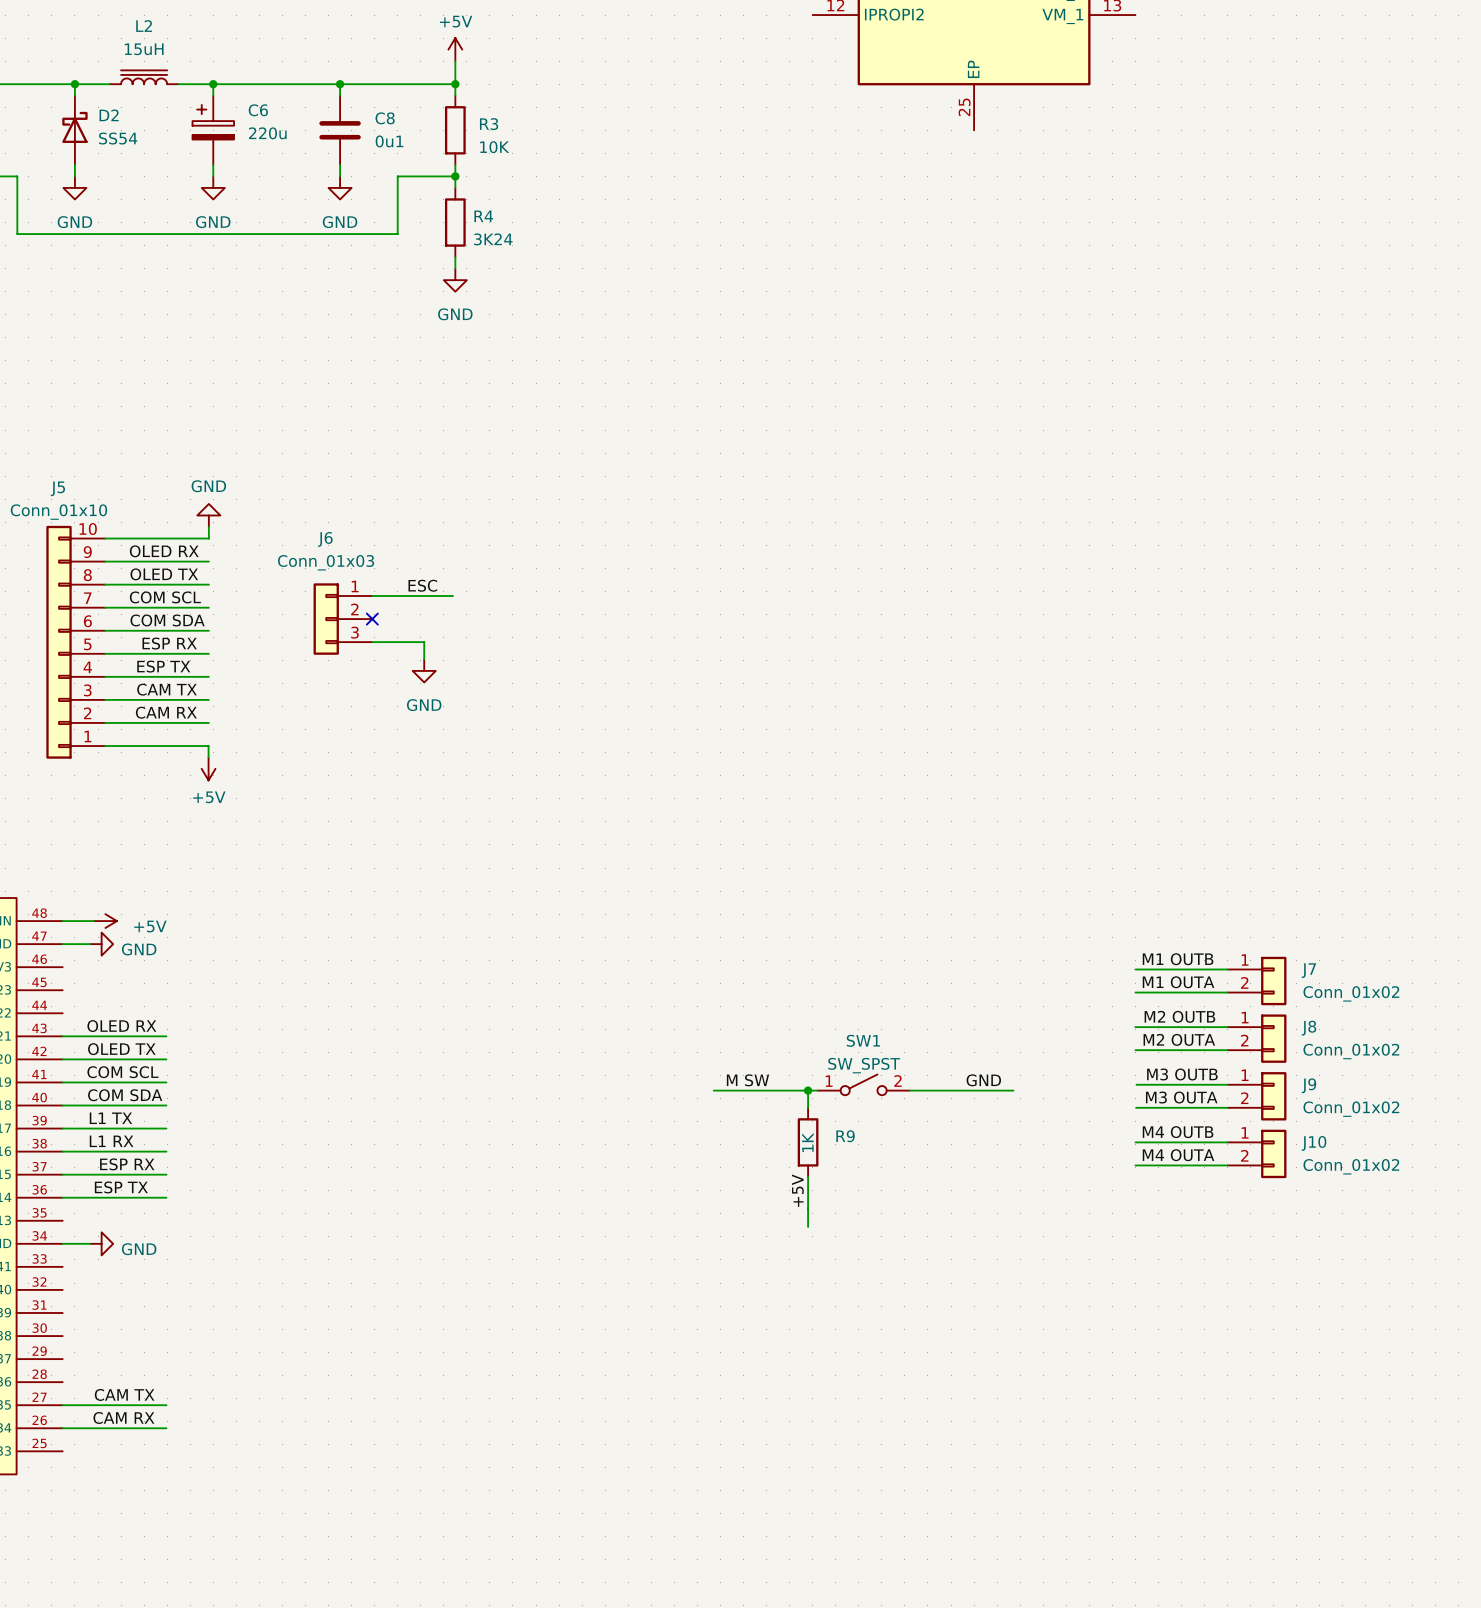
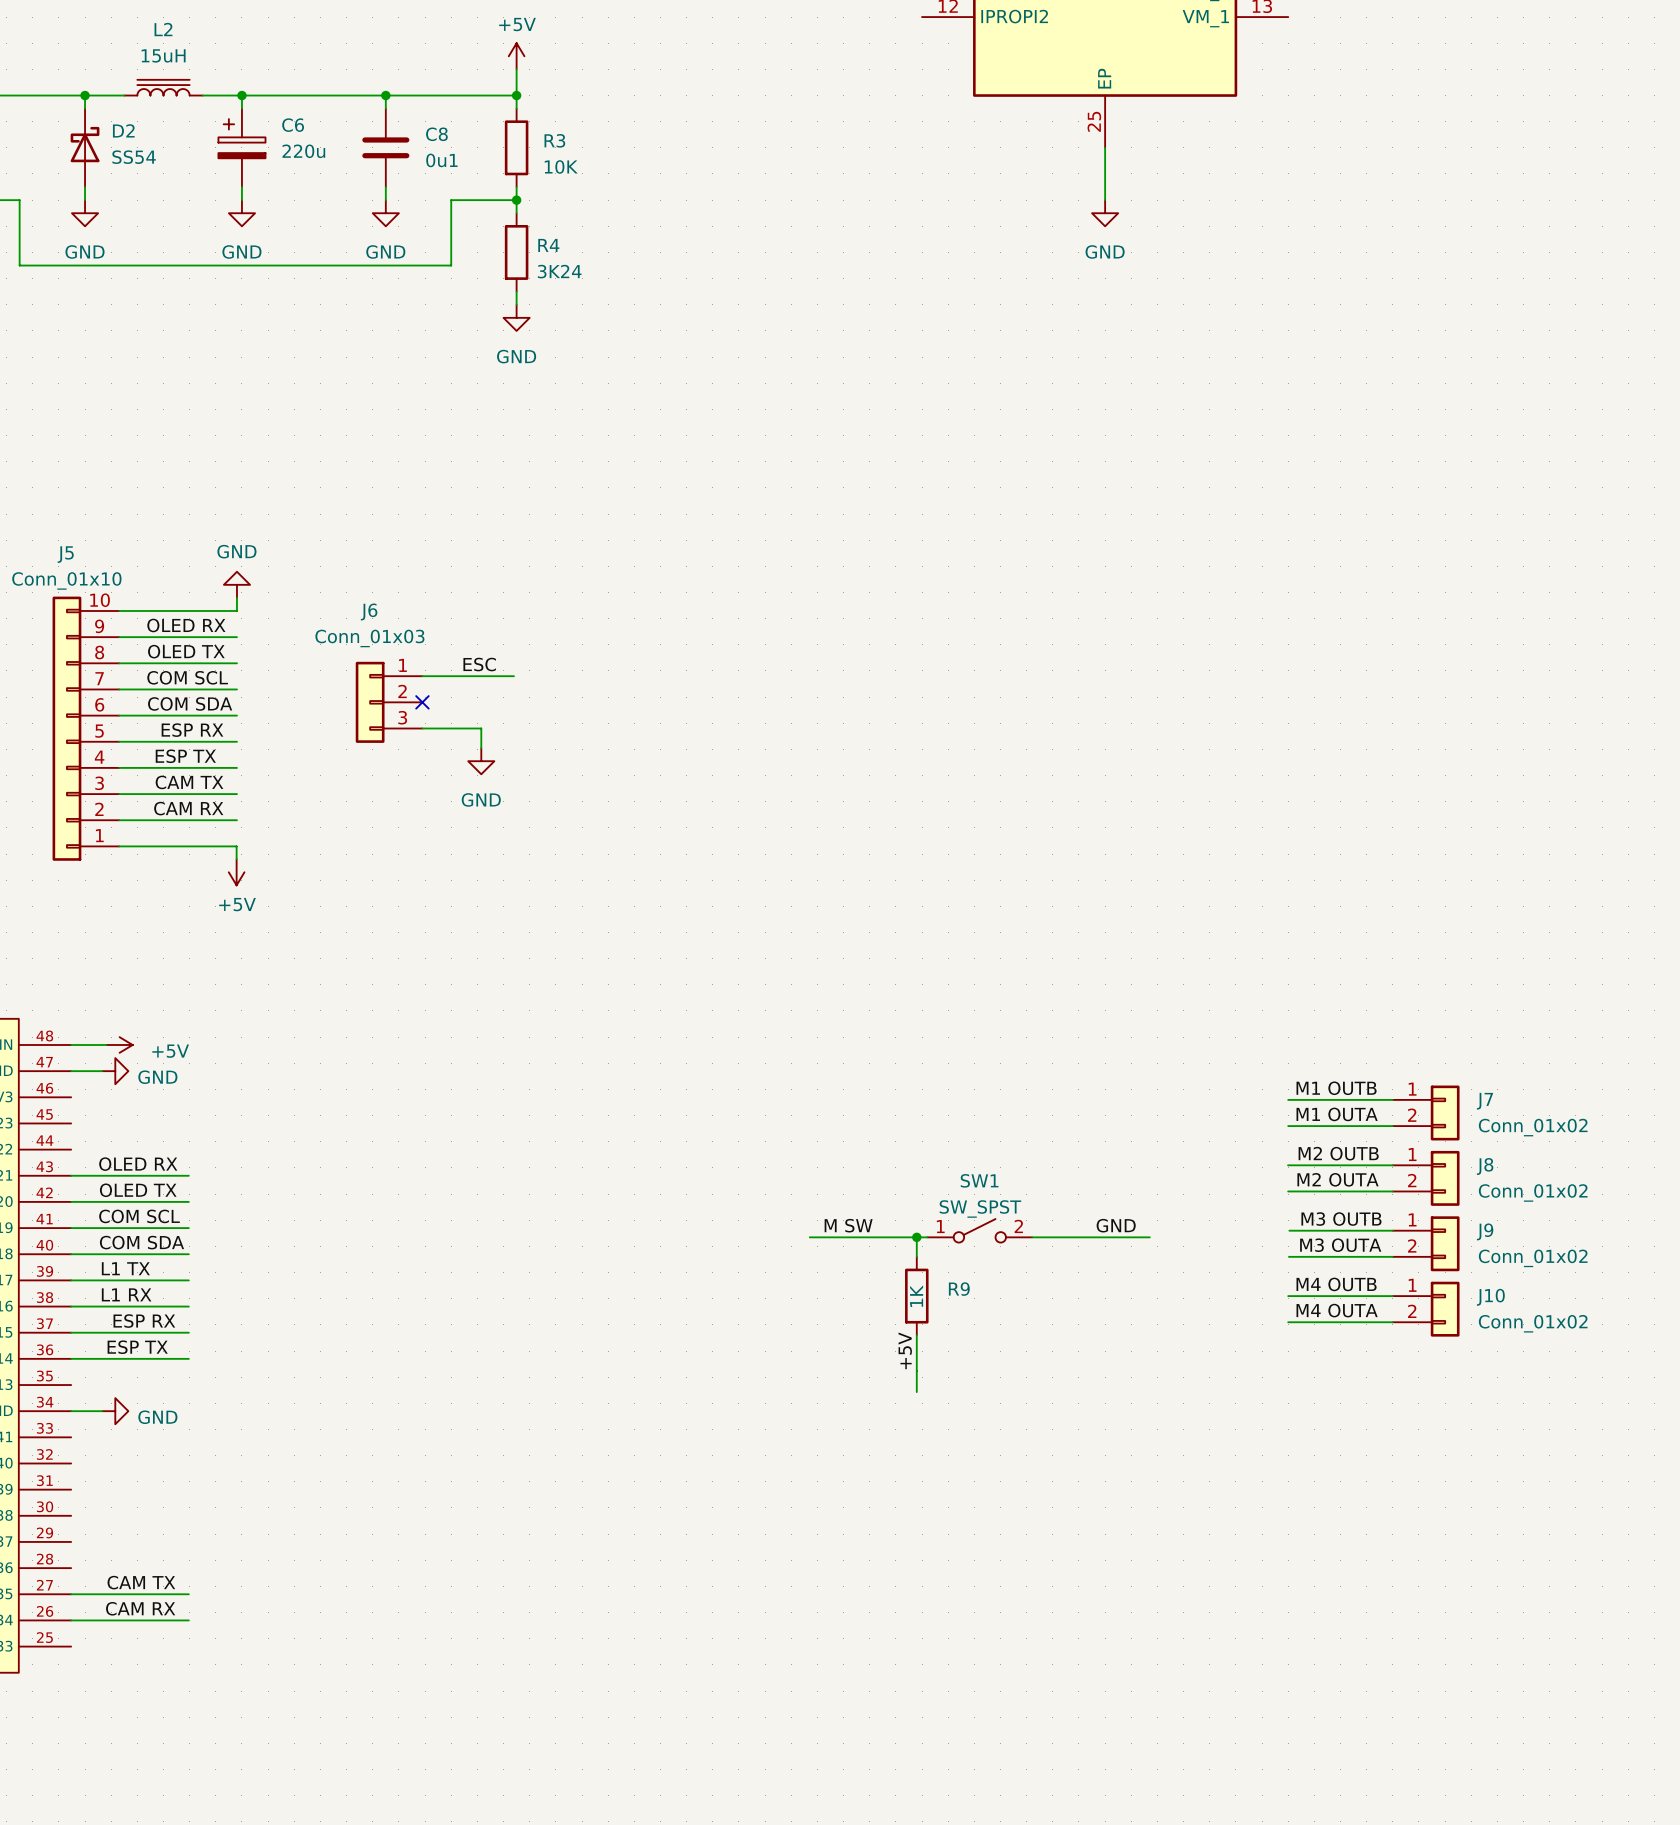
wire: none -> (1105, 147) (1105, 200)
power symbol: none -> GND (1105, 213)

